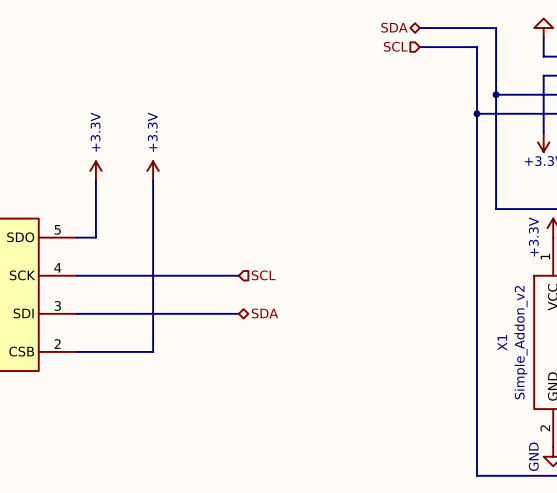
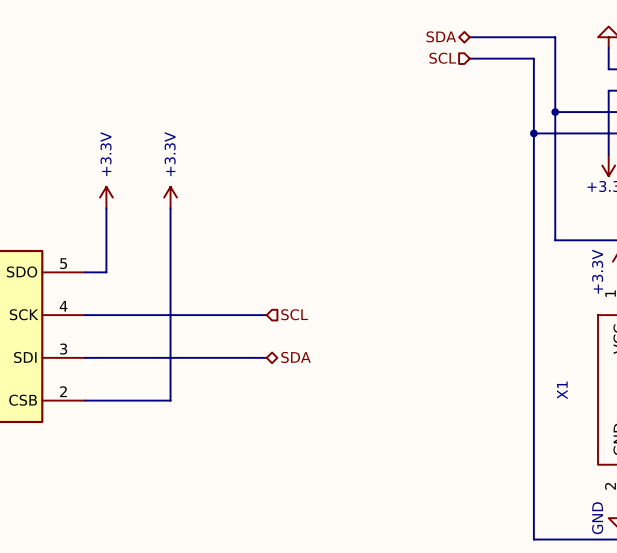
X1 value: Simple_Addon_v2 (521, 342) -> none

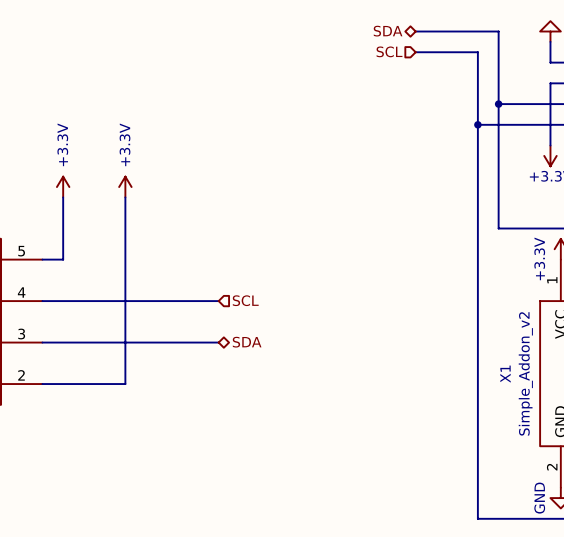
X1 value: none -> Simple_Addon_v2 (525, 373)

